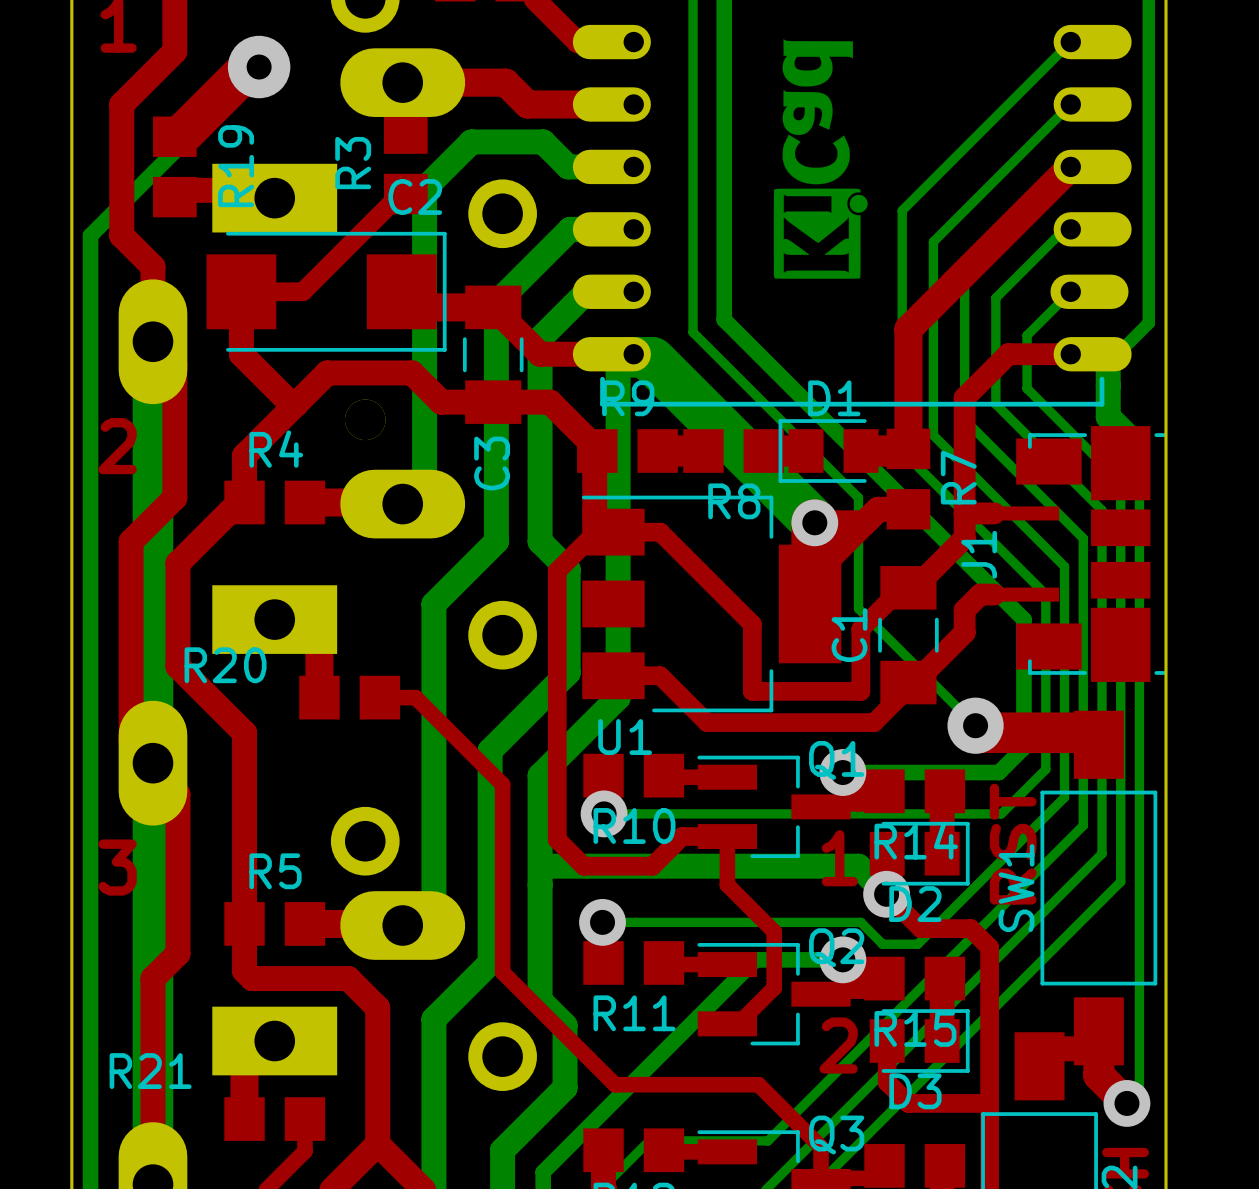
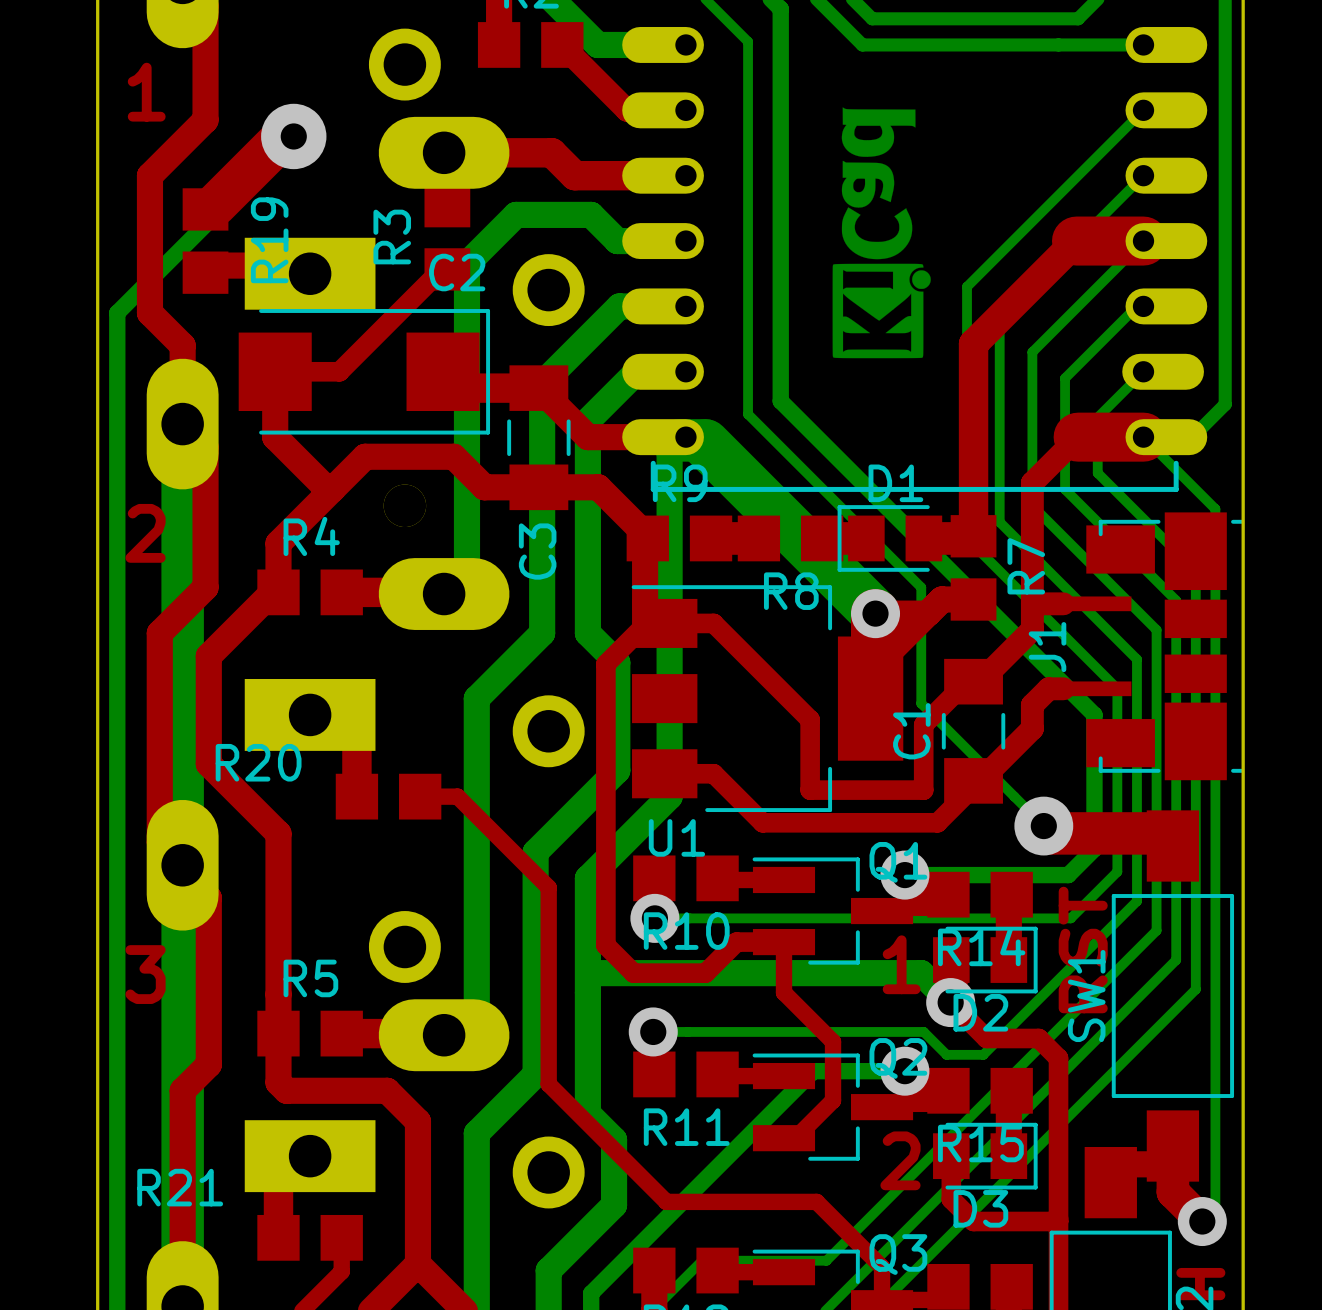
top track: (1070, 166) (908, 329) -> (1143, 241) (1076, 241) (973, 344) (973, 411)
top track width: thin (1008, 354) (1070, 354) -> thick (1078, 437) (1143, 437)
bottom track: none -> (1143, 437) (1215, 509) (1215, 528)
bottom track: (1108, 354) (1108, 416) (1133, 441) -> none

